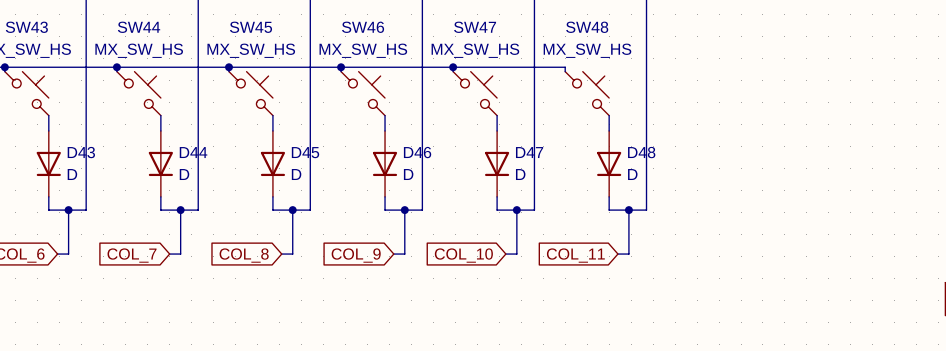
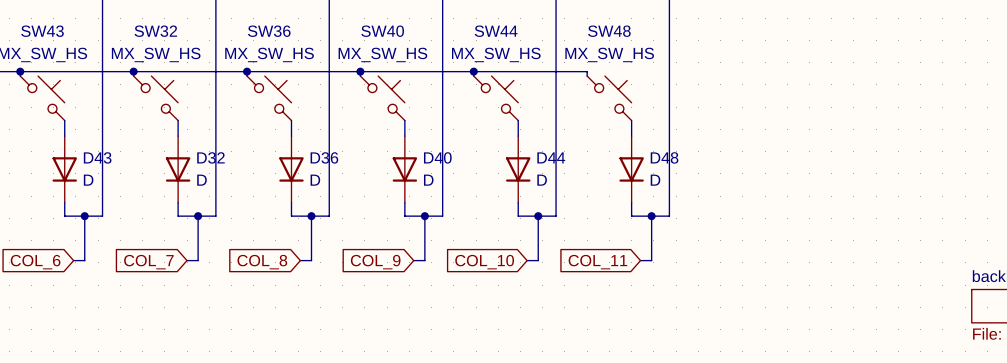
SW44 name: SW44 (139, 27) -> SW32 (155, 31)
SW45 name: SW45 (251, 27) -> SW36 (269, 31)
SW46 name: SW46 (363, 27) -> SW40 (382, 31)
SW47 name: SW47 (475, 27) -> SW44 (496, 31)
D44 name: D44 (193, 152) -> D32 (210, 157)
D45 name: D45 (305, 152) -> D36 (324, 157)
D46 name: D46 (417, 152) -> D40 (437, 157)
D47 name: D47 (529, 152) -> D44 (551, 157)

